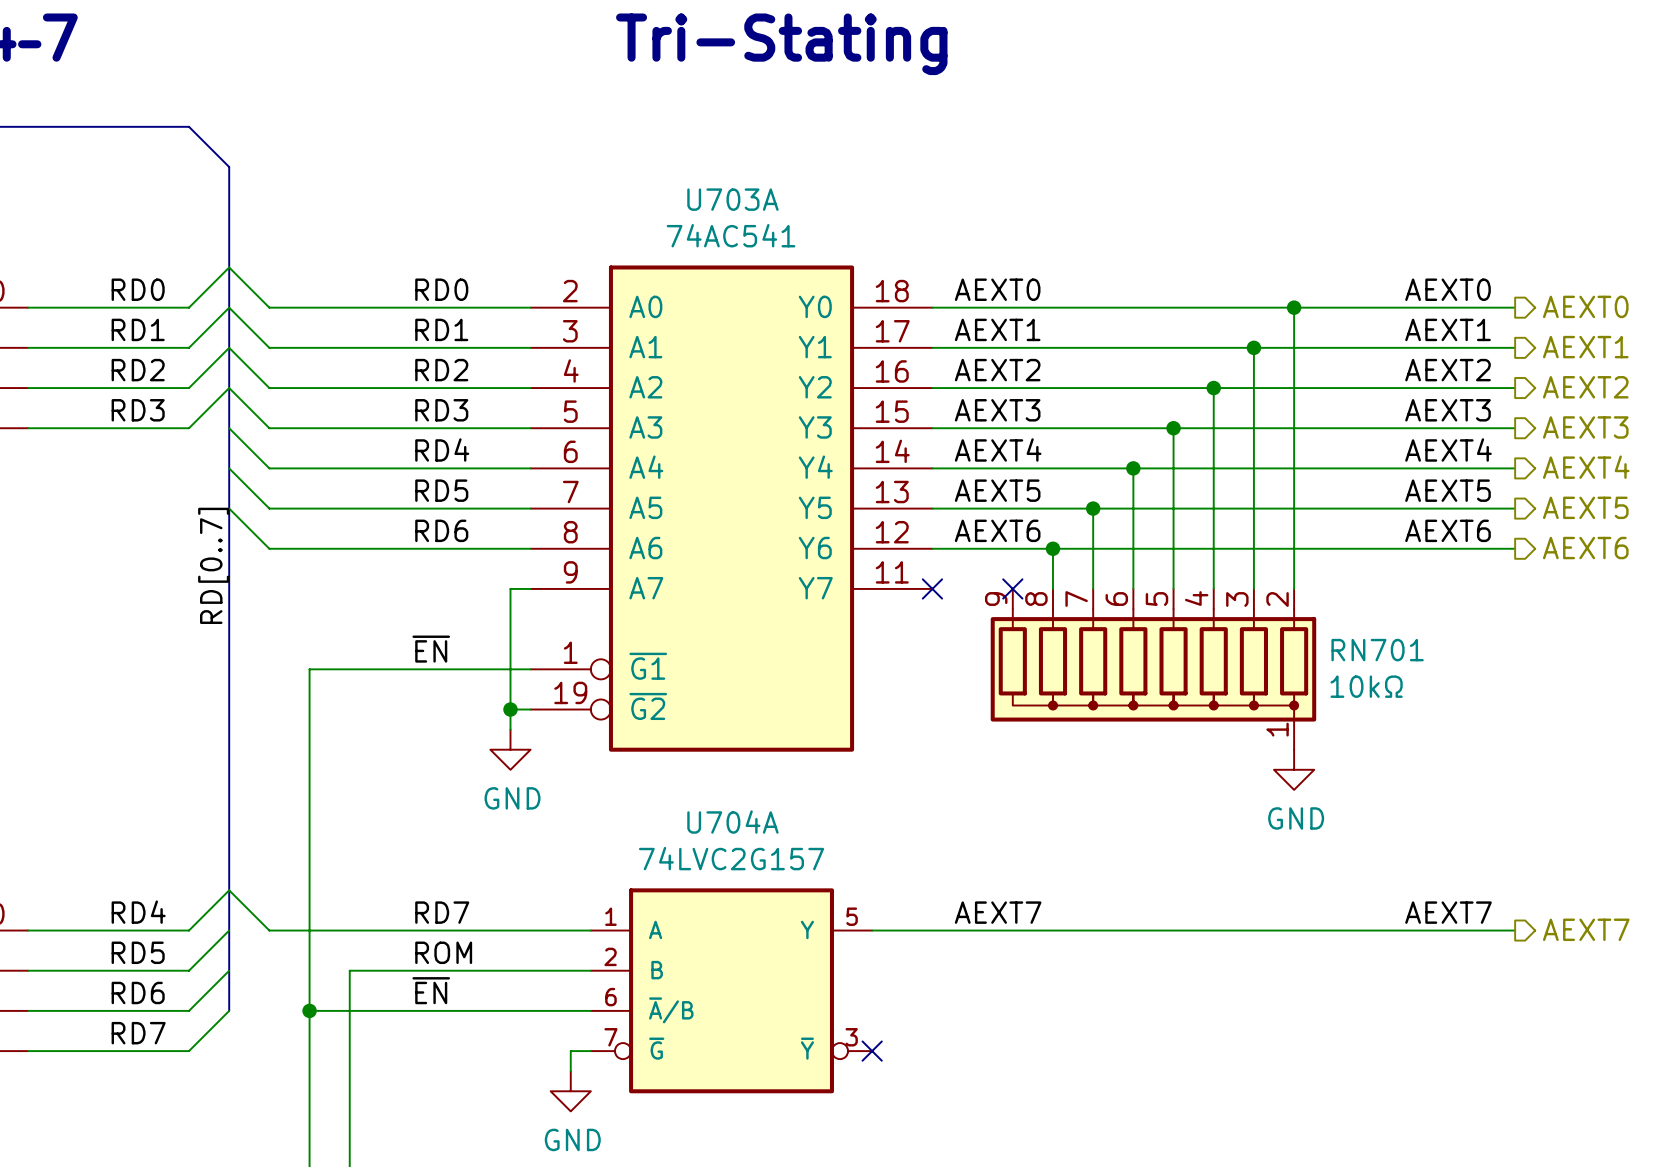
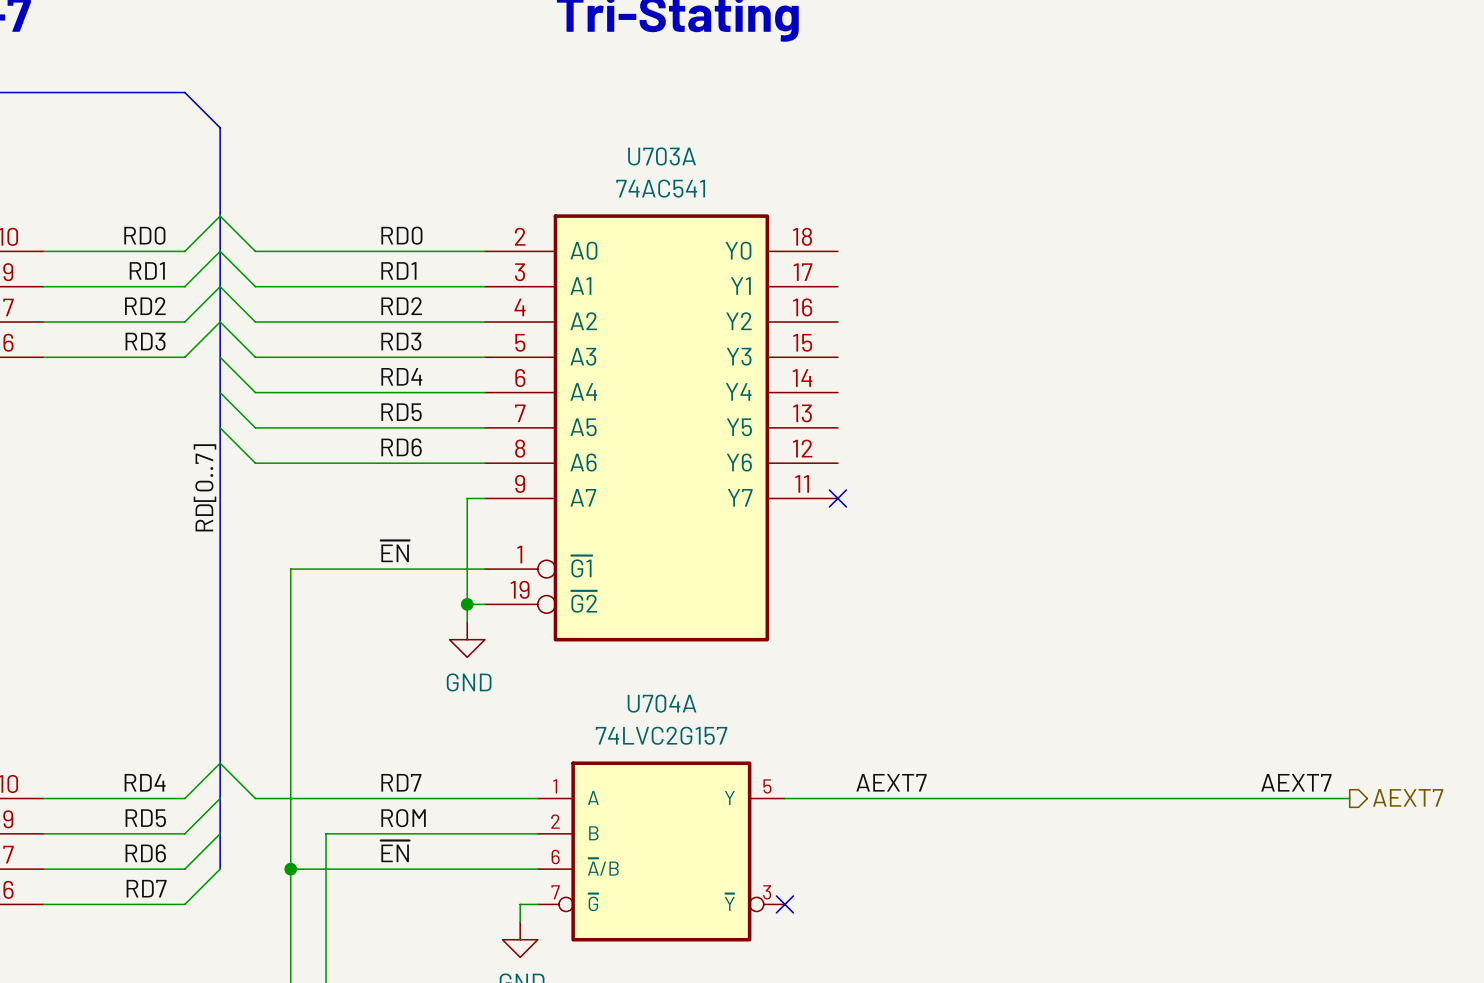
label: AEXT0 (997, 289) -> none
label: AEXT0 (1448, 289) -> none
hierarchical label: AEXT0 (1585, 306) -> none
wire: (932, 307) (1515, 307) -> none
wire: (1294, 307) (1294, 588) -> none
junction: (1294, 307) -> none
label: AEXT1 (997, 329) -> none
label: AEXT1 (1448, 329) -> none
wire: (932, 347) (1515, 347) -> none
wire: (1253, 347) (1253, 588) -> none
junction: (1253, 347) -> none
hierarchical label: AEXT1 (1585, 347) -> none
label: AEXT2 (997, 370) -> none
label: AEXT2 (1448, 370) -> none
hierarchical label: AEXT2 (1585, 387) -> none
wire: (932, 388) (1515, 388) -> none
wire: (1213, 388) (1213, 588) -> none
junction: (1213, 388) -> none
label: AEXT3 (997, 410) -> none
label: AEXT3 (1448, 410) -> none
hierarchical label: AEXT3 (1585, 427) -> none
wire: (932, 428) (1515, 428) -> none
wire: (1173, 428) (1173, 588) -> none
junction: (1173, 428) -> none
label: AEXT4 (998, 450) -> none
label: AEXT4 (1448, 450) -> none
hierarchical label: AEXT4 (1586, 467) -> none
wire: (932, 468) (1515, 468) -> none
wire: (1133, 468) (1133, 588) -> none
junction: (1133, 468) -> none
label: AEXT5 (997, 490) -> none
label: AEXT5 (1448, 490) -> none
hierarchical label: AEXT5 (1585, 507) -> none
wire: (932, 508) (1515, 508) -> none
wire: (1093, 508) (1093, 588) -> none
junction: (1093, 508) -> none
label: AEXT6 (997, 530) -> none
label: AEXT6 (1448, 530) -> none
wire: (932, 548) (1515, 548) -> none
wire: (1053, 548) (1053, 588) -> none
junction: (1053, 548) -> none
hierarchical label: AEXT6 (1585, 548) -> none
no-connect mark: (1012, 588) -> none
RN701: 10kΩ (1153, 669) -> none
power symbol: GND (1294, 769) -> none

